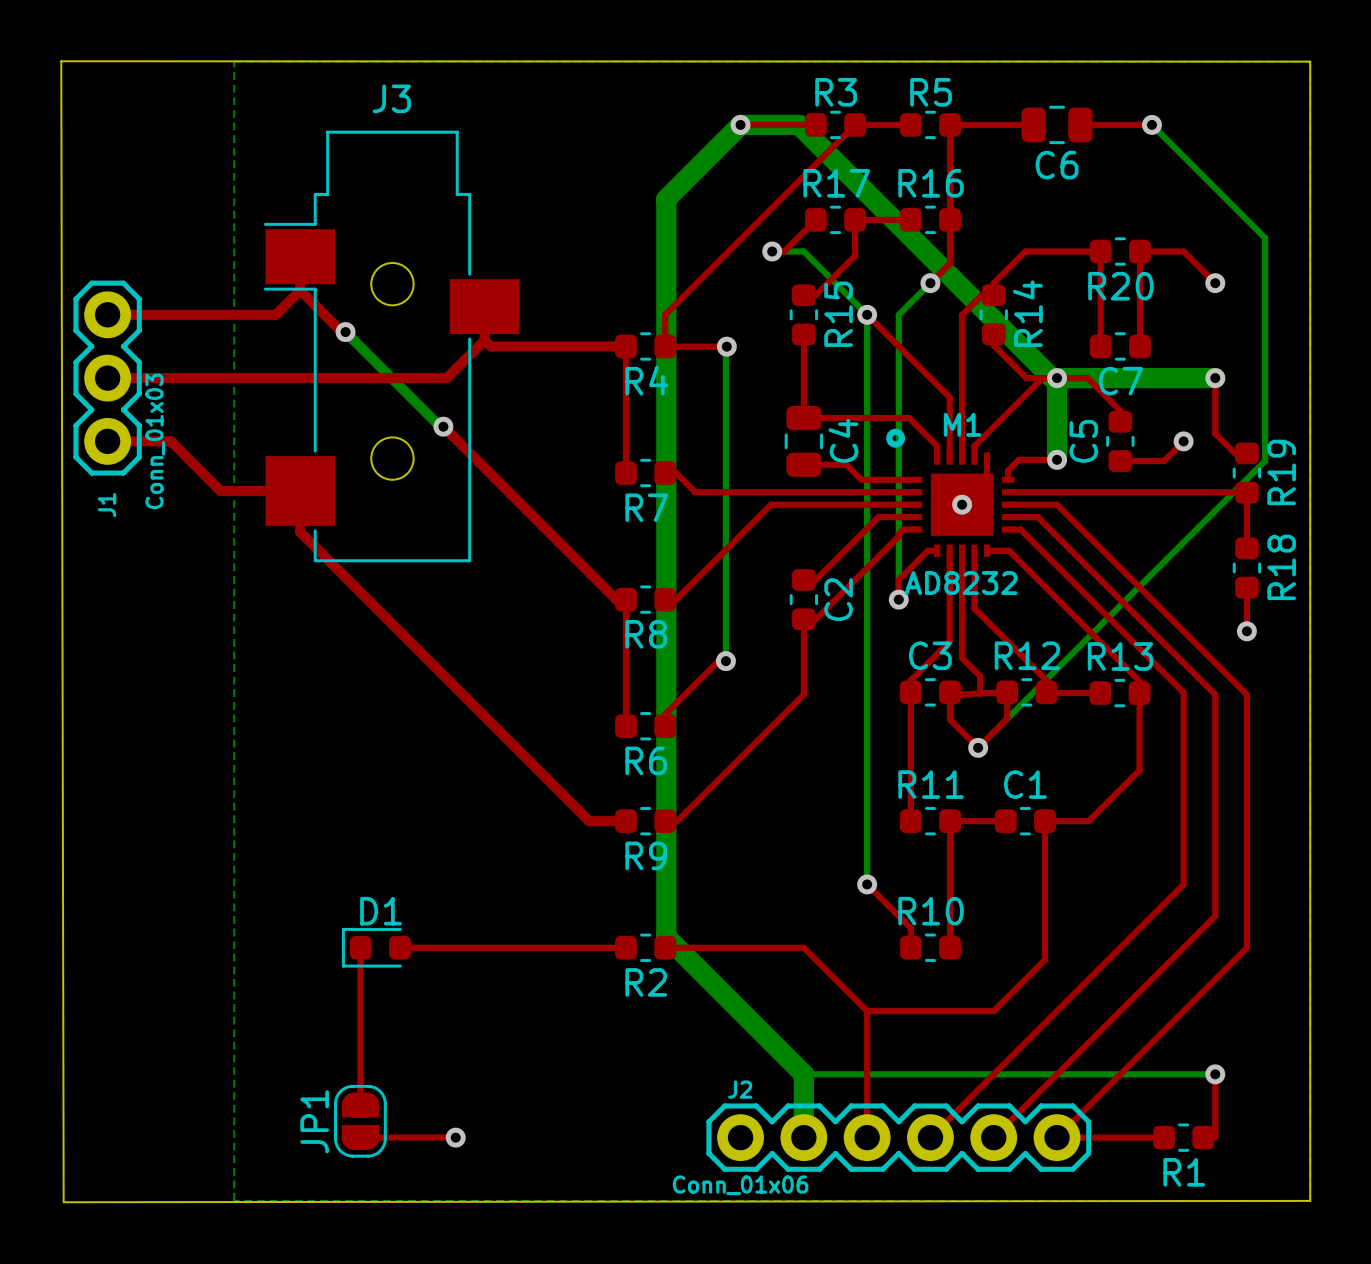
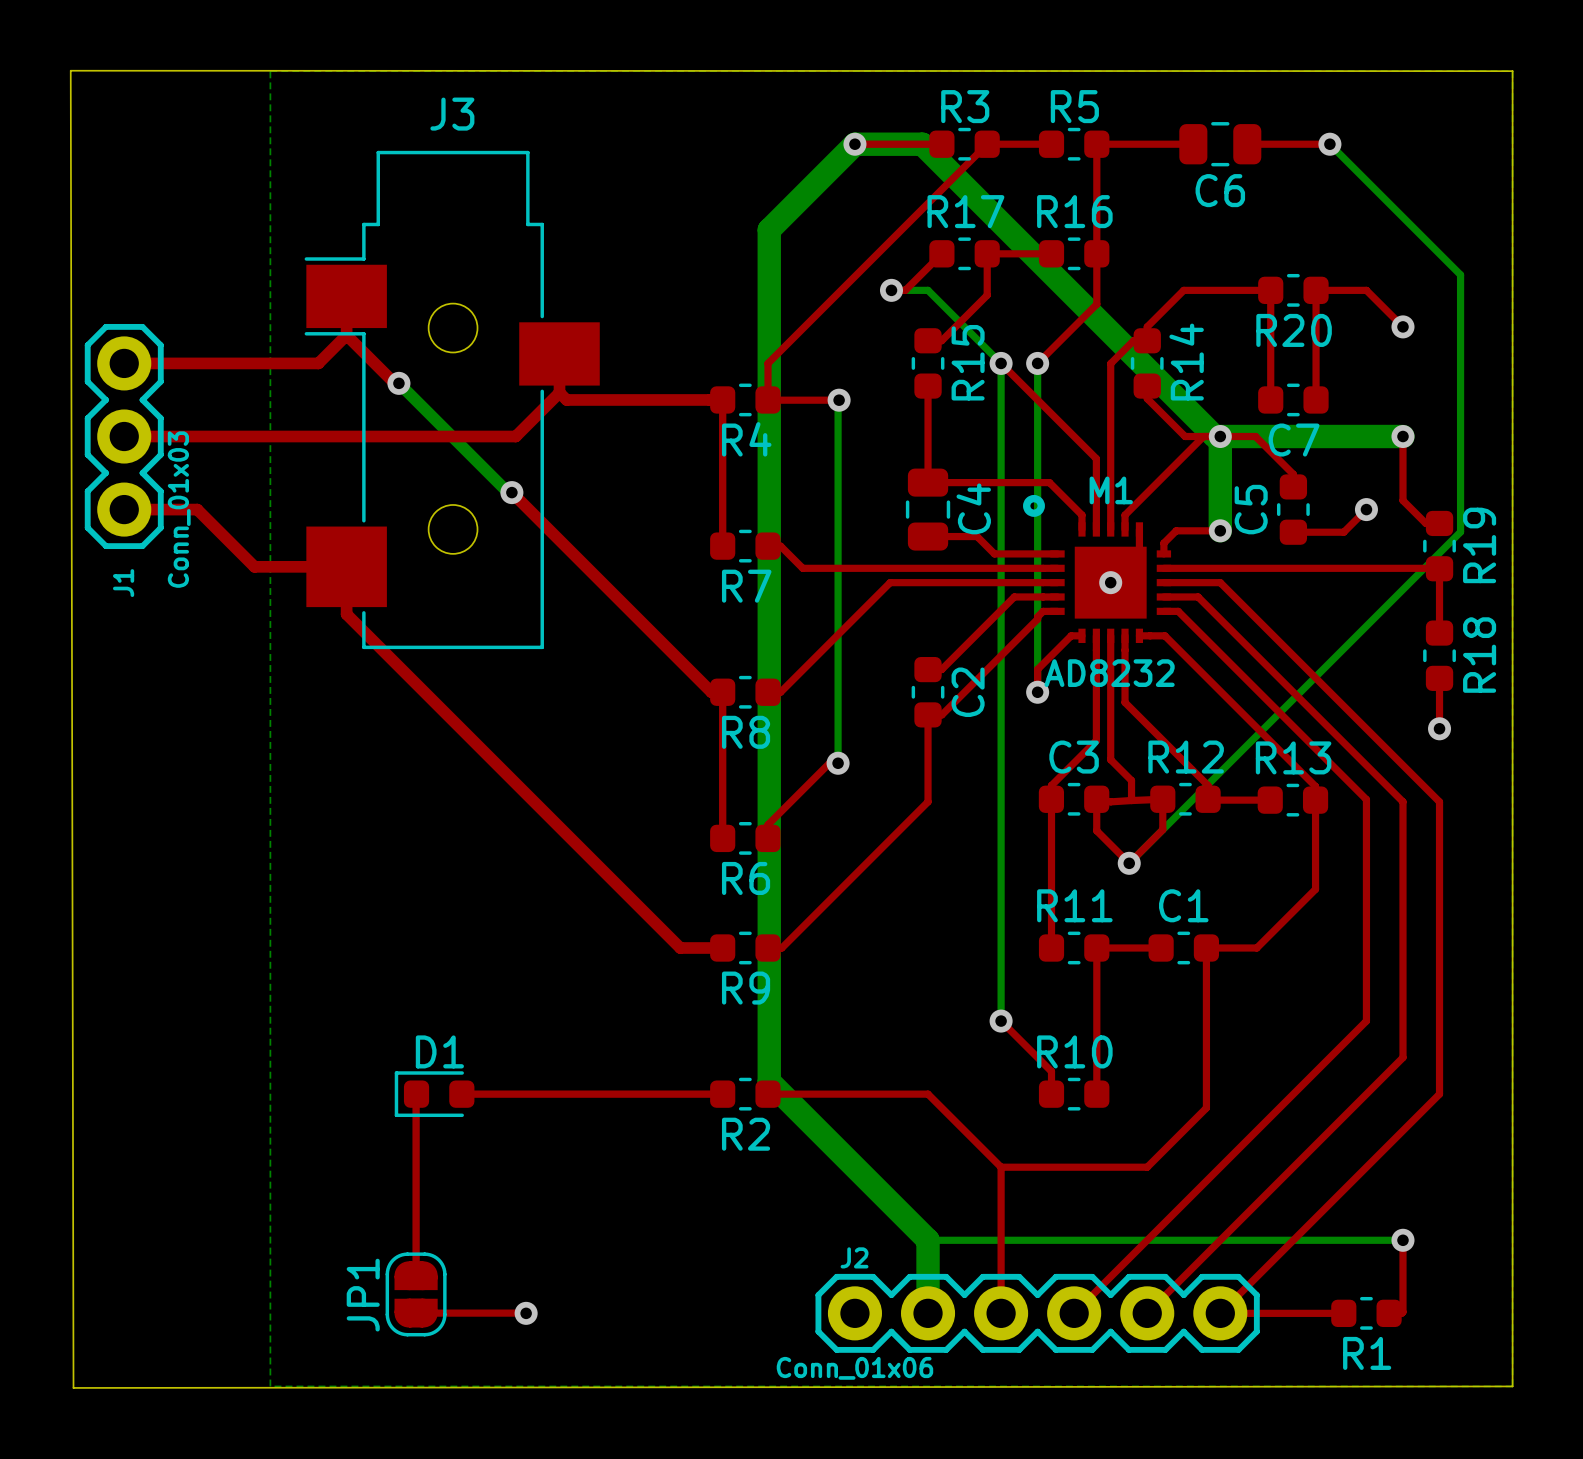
top track: none -> (1074, 326) (1037, 363)
bottom track: (930, 283) (898, 314) -> none
via position: (930, 283) -> (1037, 363)

